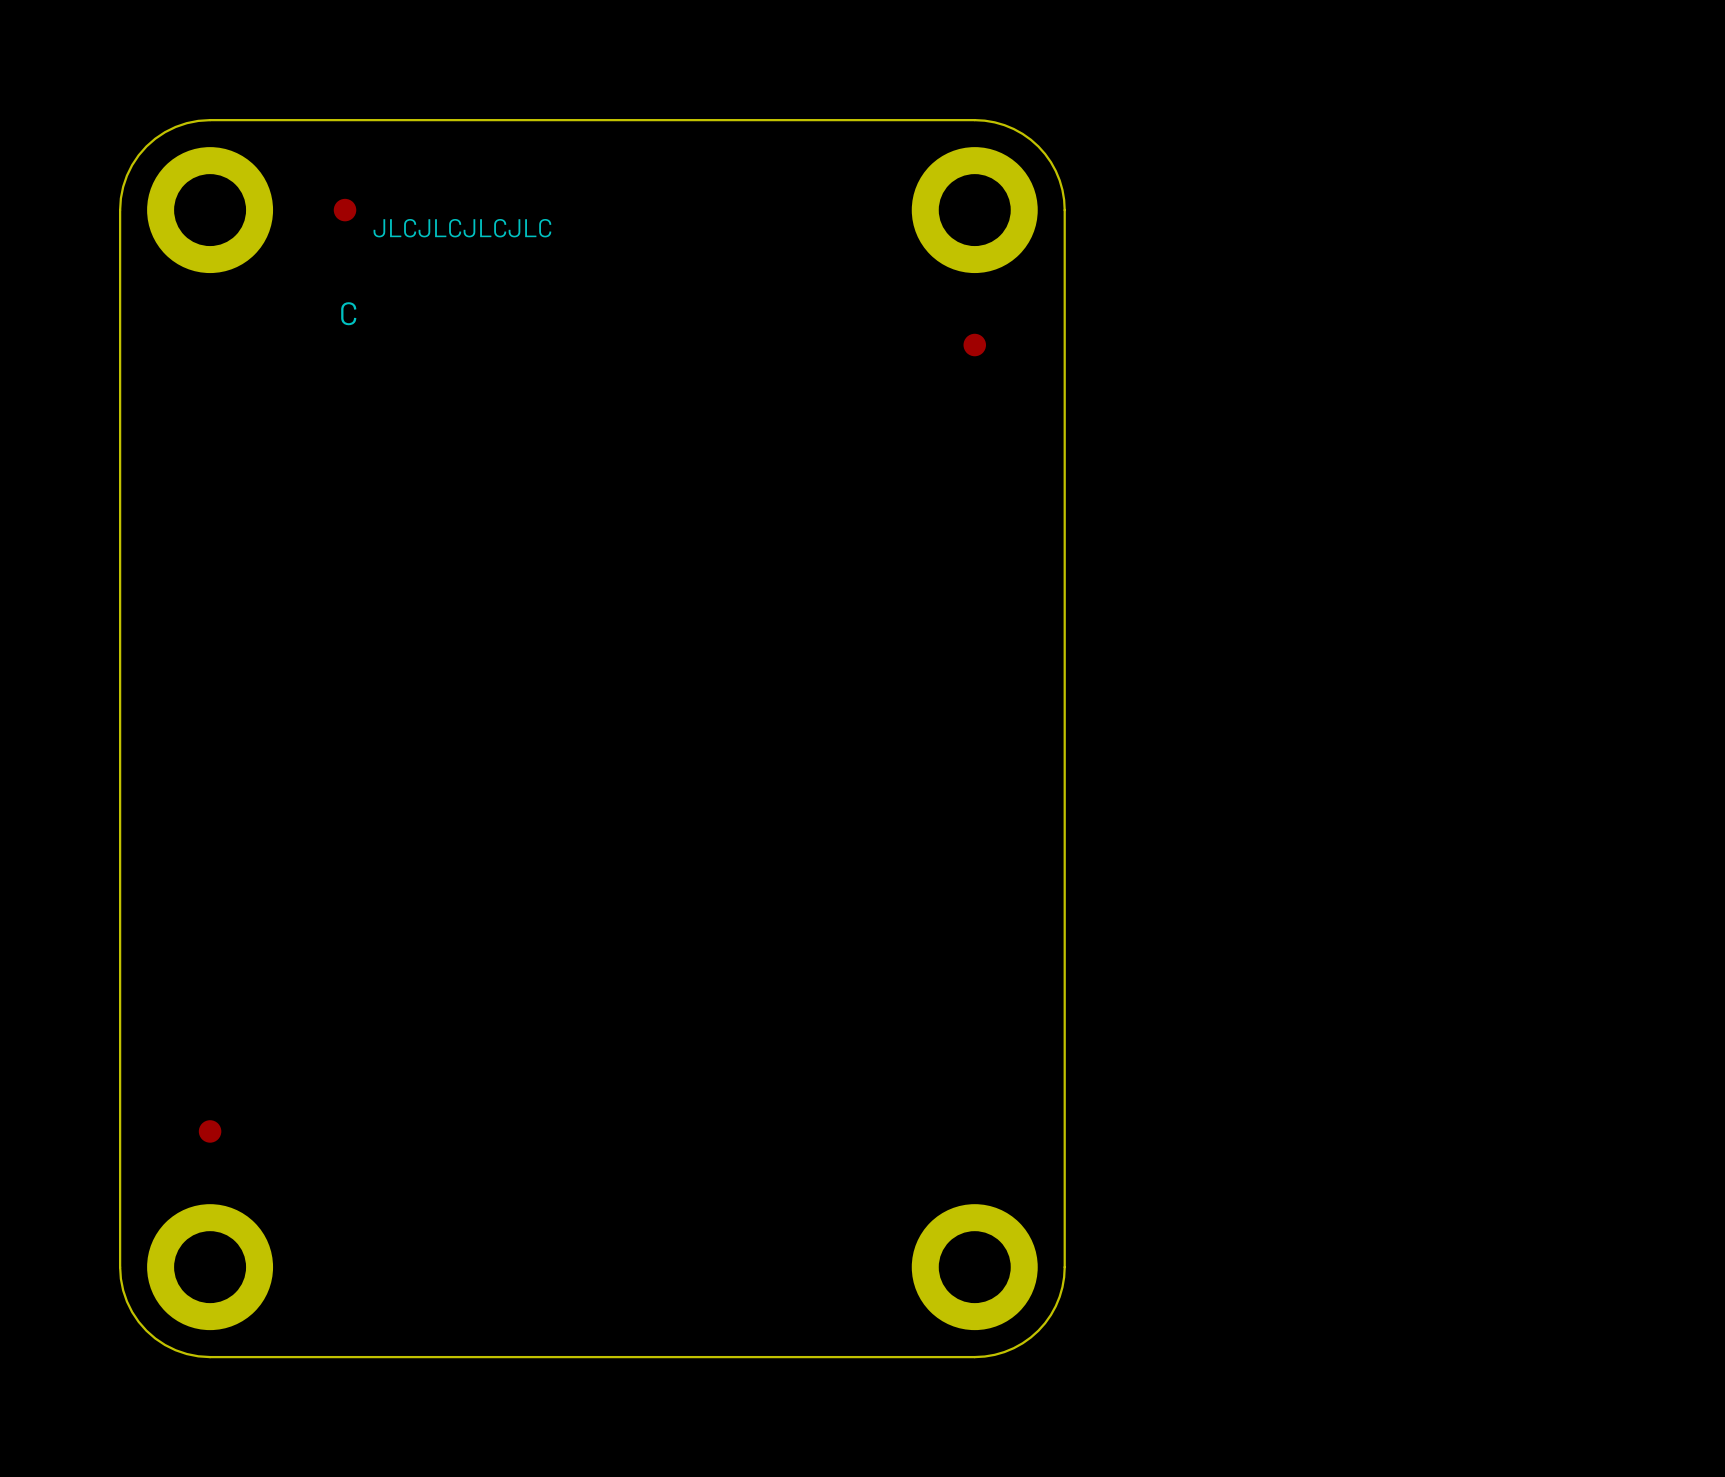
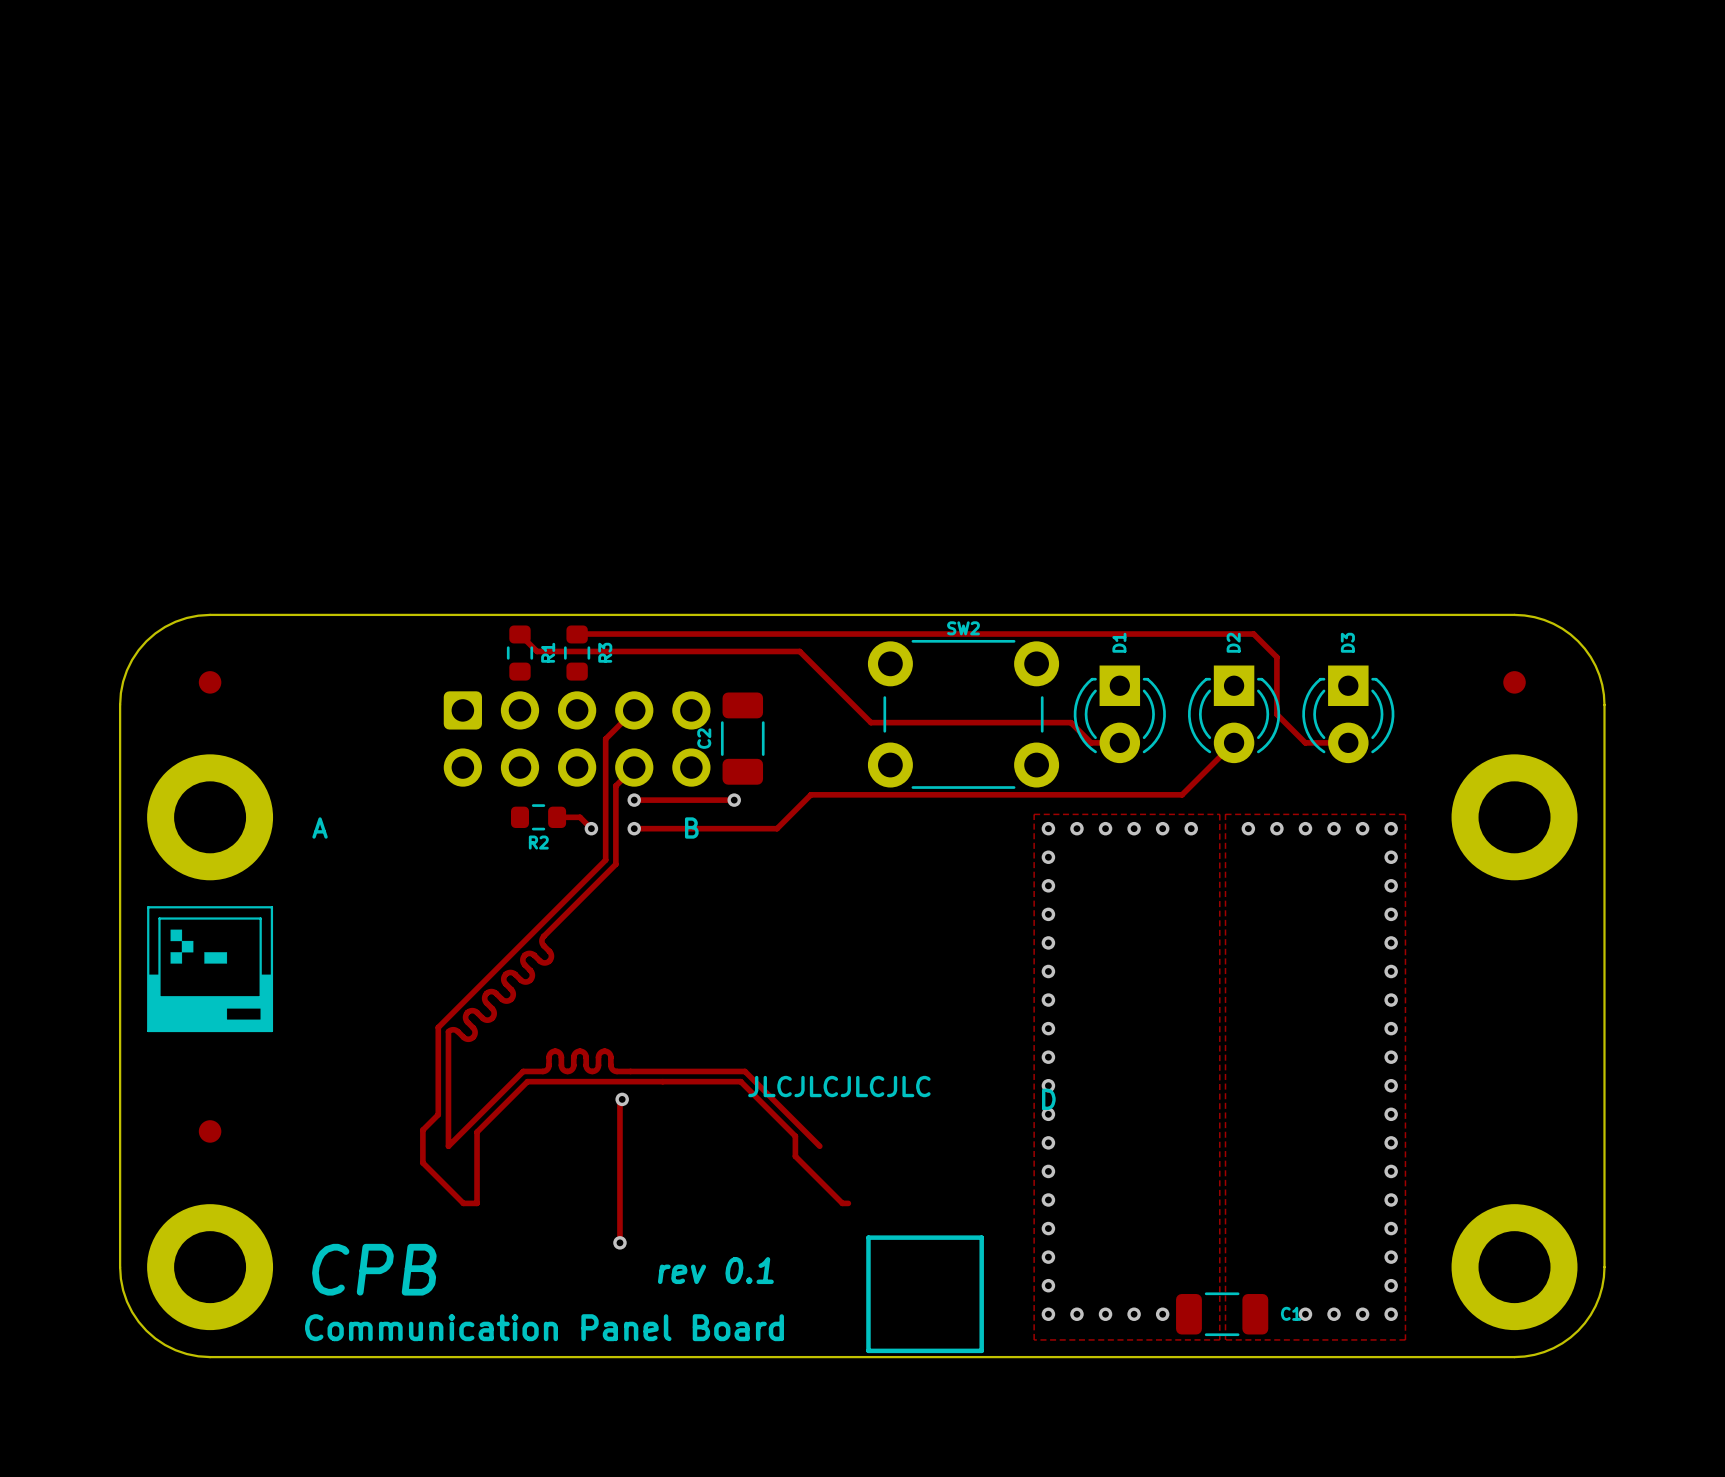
part: (210, 210) -> none
part: (345, 210) -> none
part: (974, 210) -> none
text: JLCJLCJLCJLC (462, 228) -> none
text: C (348, 313) -> none
part: (974, 345) -> none
track: none -> (519, 634) (537, 651) (799, 651) (870, 722) (1070, 722) (1091, 742) (1119, 742)
track: none -> (577, 634) (1253, 634) (1276, 657) (1276, 714) (1305, 742) (1348, 742)
R1: none -> (519, 653)
R3: none -> (577, 653)
part: none -> (210, 682)
part: none -> (1514, 682)
board edge: (120, 704) (120, 198) (123, 186) (132, 165) (146, 146) (165, 132) (186, 123) (210, 120) (974, 120) (1004, 125) (1030, 139) (1045, 153) (1055, 171) (1062, 190) (1064, 210) (1064, 1267) (1059, 1296) (1050, 1314) (1038, 1330) (1022, 1343) (1004, 1352) (974, 1357) -> (120, 704) (123, 681) (126, 670) (138, 650) (146, 641) (165, 626) (175, 621) (186, 617) (210, 614) (1514, 614) (1544, 619) (1570, 634) (1584, 648) (1595, 665) (1602, 684) (1604, 704) (1604, 1267) (1599, 1296) (1584, 1323) (1570, 1337) (1553, 1348) (1534, 1354) (1514, 1357) (974, 1357)
track: none -> (634, 710) (605, 738) (605, 860) (438, 1027) (438, 1114) (422, 1130) (422, 1162) (463, 1203) (477, 1203) (477, 1132) (527, 1081) (740, 1081) (795, 1136) (795, 1156) (842, 1203) (848, 1203)
SW2: none -> (963, 714)
D1: none -> (1119, 714)
D2: none -> (1234, 714)
D3: none -> (1348, 714)
part: none -> (577, 738)
C2: none -> (742, 738)
track: none -> (1234, 742) (1182, 794) (810, 794) (777, 828) (634, 828)
track: none -> (634, 767) (615, 785) (615, 864) (542, 937) (542, 943) (550, 953) (550, 959) (543, 962) (531, 953) (524, 955) (523, 962) (531, 971) (531, 977) (524, 981) (512, 972) (505, 974) (504, 981) (513, 993) (509, 1000) (503, 1000) (493, 991) (486, 993) (485, 1000) (494, 1011) (491, 1019) (484, 1019) (473, 1010) (467, 1012) (465, 1019) (474, 1031) (471, 1038) (465, 1038) (454, 1029) (448, 1031) (448, 1146) (523, 1071) (547, 1069) (549, 1055) (555, 1051) (560, 1054) (561, 1067) (566, 1071) (572, 1068) (574, 1055) (579, 1051) (585, 1055) (587, 1069) (591, 1071) (595, 1070) (598, 1066) (598, 1055) (604, 1051) (610, 1054) (611, 1067) (616, 1071) (744, 1071) (819, 1146)
track: none -> (634, 800) (734, 800)
via: none -> (634, 800)
via: none -> (734, 800)
zone outline: none -> (1034, 814) (1034, 1339) (1219, 1339) (1219, 814) (1034, 814)
zone outline: none -> (1225, 814) (1405, 814) (1405, 1339) (1225, 1339) (1225, 814)
part: none -> (210, 817)
R2: none -> (538, 817)
track: none -> (557, 817) (580, 817) (591, 828)
part: none -> (1514, 817)
text: none -> A (320, 828)
via: none -> (591, 828)
via: none -> (634, 828)
text: none -> B (691, 828)
via: none -> (1048, 828)
via: none -> (1076, 828)
via: none -> (1105, 828)
via: none -> (1134, 828)
via: none -> (1162, 828)
via: none -> (1191, 828)
via: none -> (1248, 828)
via: none -> (1276, 828)
via: none -> (1305, 828)
via: none -> (1334, 828)
via: none -> (1362, 828)
via: none -> (1391, 828)
via: none -> (1048, 857)
via: none -> (1391, 857)
via: none -> (1048, 885)
via: none -> (1391, 885)
line: none -> (148, 907) (271, 907) (271, 1030) (148, 1030) (148, 907)
via: none -> (1048, 914)
via: none -> (1391, 914)
line: none -> (159, 918) (260, 918) (260, 997) (159, 997) (159, 918)
drawing: none -> [148, 929, 273, 1032]
via: none -> (1048, 942)
via: none -> (1391, 942)
via: none -> (1048, 971)
via: none -> (1391, 971)
via: none -> (1048, 1000)
via: none -> (1391, 1000)
via: none -> (1048, 1028)
via: none -> (1391, 1028)
via: none -> (1048, 1057)
via: none -> (1391, 1057)
via: none -> (1048, 1085)
via: none -> (1391, 1085)
text: none -> JLCJLCJLCJLC (839, 1086)
track: none -> (622, 1099) (619, 1101) (619, 1242)
via: none -> (622, 1099)
text: none -> D (1048, 1099)
via: none -> (1048, 1114)
via: none -> (1391, 1114)
via: none -> (1048, 1142)
via: none -> (1391, 1142)
via: none -> (1048, 1171)
via: none -> (1391, 1171)
via: none -> (1048, 1199)
via: none -> (1391, 1199)
via: none -> (1048, 1228)
via: none -> (1391, 1228)
line: none -> (868, 1237) (868, 1350) (981, 1350) (981, 1237) (868, 1237)
via: none -> (619, 1242)
via: none -> (1048, 1257)
via: none -> (1391, 1257)
part: (974, 1267) -> none
part: none -> (1514, 1267)
text: none -> CPB (374, 1269)
text: none -> rev 0.1 (715, 1270)
via: none -> (1048, 1285)
via: none -> (1391, 1285)
via: none -> (1048, 1314)
via: none -> (1076, 1314)
via: none -> (1105, 1314)
via: none -> (1134, 1314)
via: none -> (1162, 1314)
C1: none -> (1222, 1314)
via: none -> (1305, 1314)
via: none -> (1334, 1314)
via: none -> (1362, 1314)
via: none -> (1391, 1314)
text: none -> Communication Panel Board (544, 1327)

